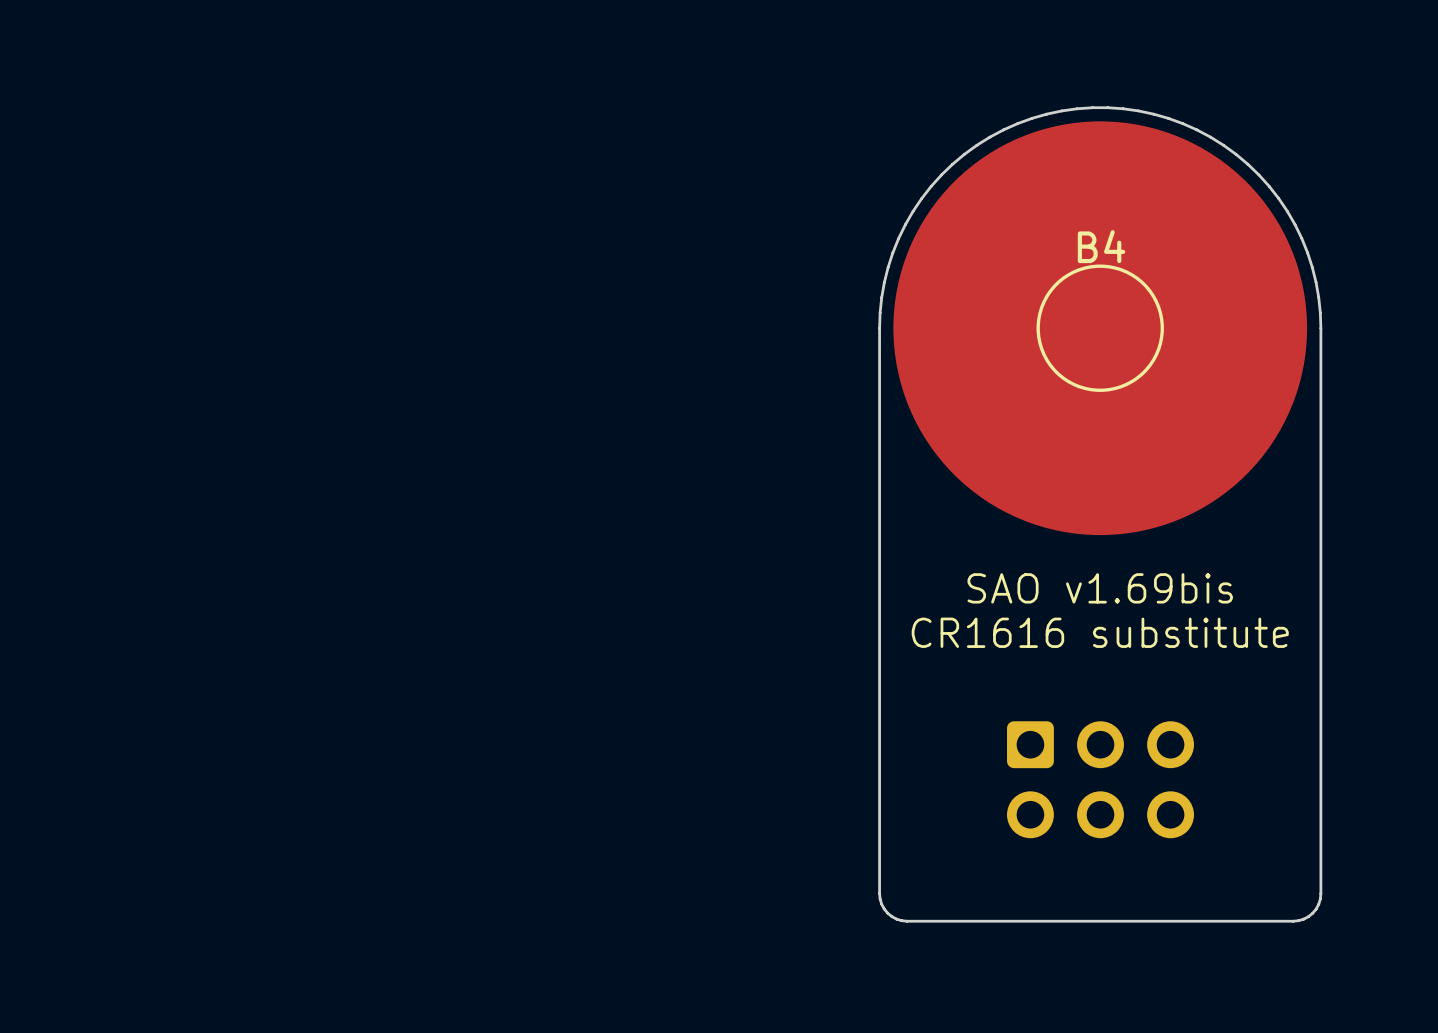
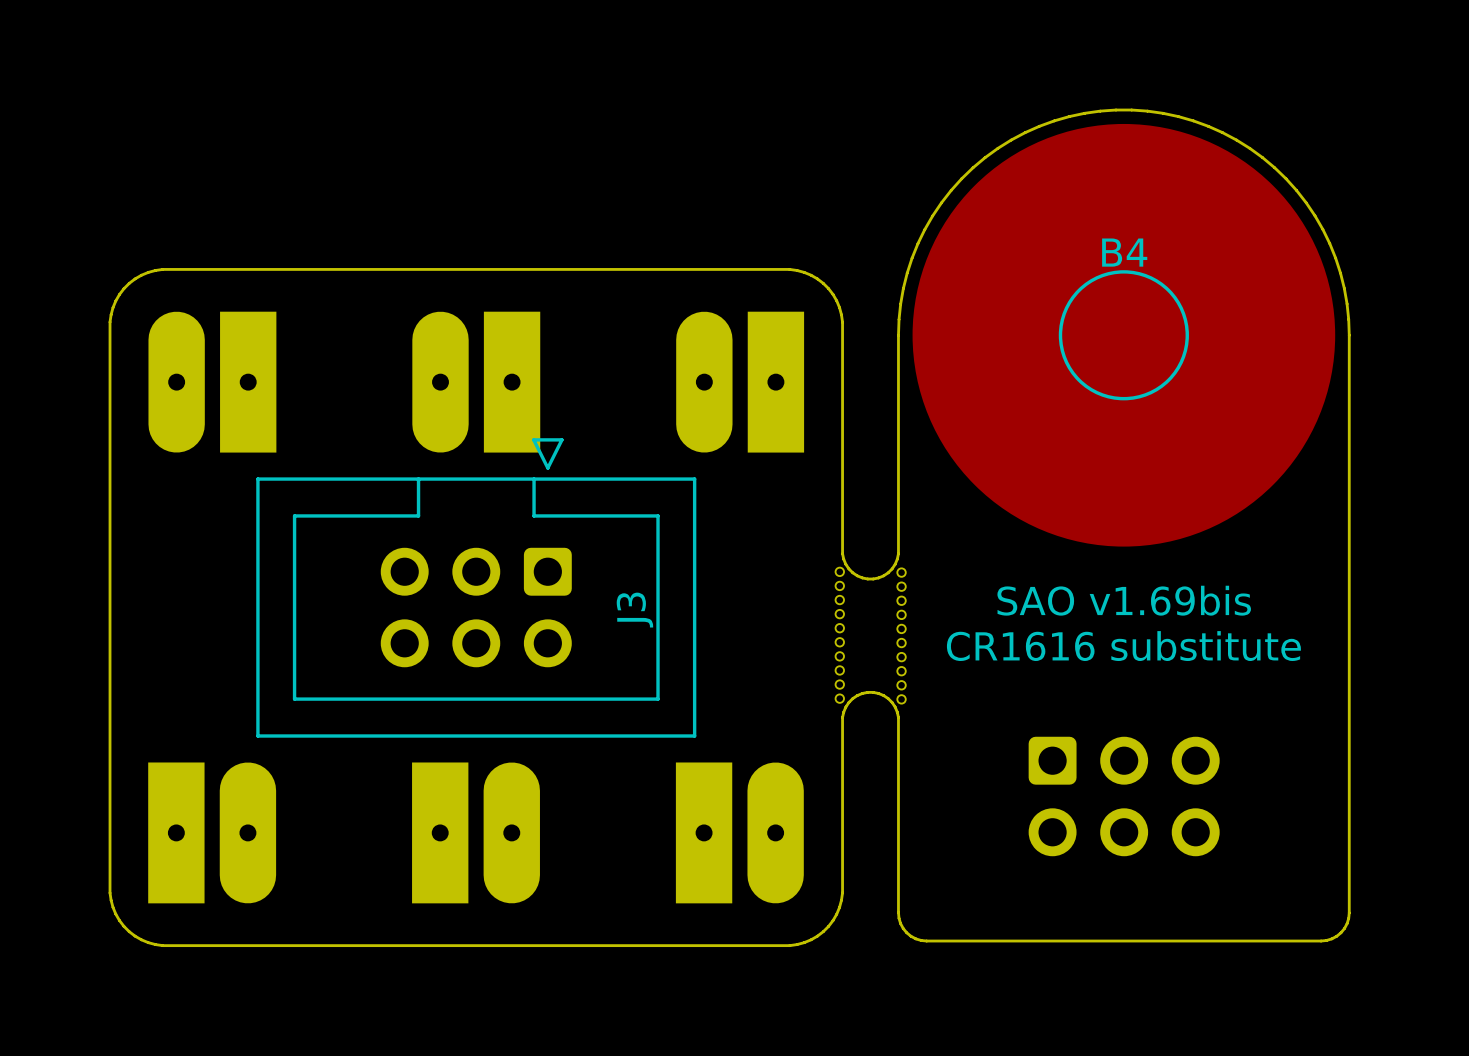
board edge: (898, 238) (884, 282) (879, 328) (879, 893) (881, 904) (887, 913) (896, 919) (907, 921) -> (917, 243) (903, 288) (899, 319) (898, 553) (895, 564) (888, 572) (873, 579) (862, 577) (852, 572) (845, 564) (842, 553) (841, 314) (836, 300) (828, 288) (817, 278) (804, 272) (789, 269) (162, 269) (141, 275) (129, 283) (115, 300) (110, 322) (110, 892) (115, 914) (129, 931) (141, 939) (162, 945) (797, 944) (811, 939) (823, 931) (833, 920) (839, 907) (842, 892) (842, 717) (845, 707) (852, 698) (862, 693) (873, 692) (888, 698) (895, 707) (898, 717) (899, 918) (906, 932) (915, 938) (926, 941)
part: none -> (212, 382)
part: none -> (476, 382)
part: none -> (740, 382)
part: none -> (839, 571)
part: none -> (901, 572)
part: none -> (839, 585)
part: none -> (901, 586)
J3: none -> (476, 587)
part: none -> (839, 600)
part: none -> (901, 600)
part: none -> (839, 614)
part: none -> (901, 614)
part: none -> (839, 628)
part: none -> (901, 628)
part: none -> (839, 642)
part: none -> (901, 643)
part: none -> (839, 656)
part: none -> (901, 657)
part: none -> (839, 670)
part: none -> (901, 671)
part: none -> (839, 684)
part: none -> (901, 685)
part: none -> (839, 698)
part: none -> (901, 699)
part: none -> (212, 832)
part: none -> (476, 832)
part: none -> (739, 832)

